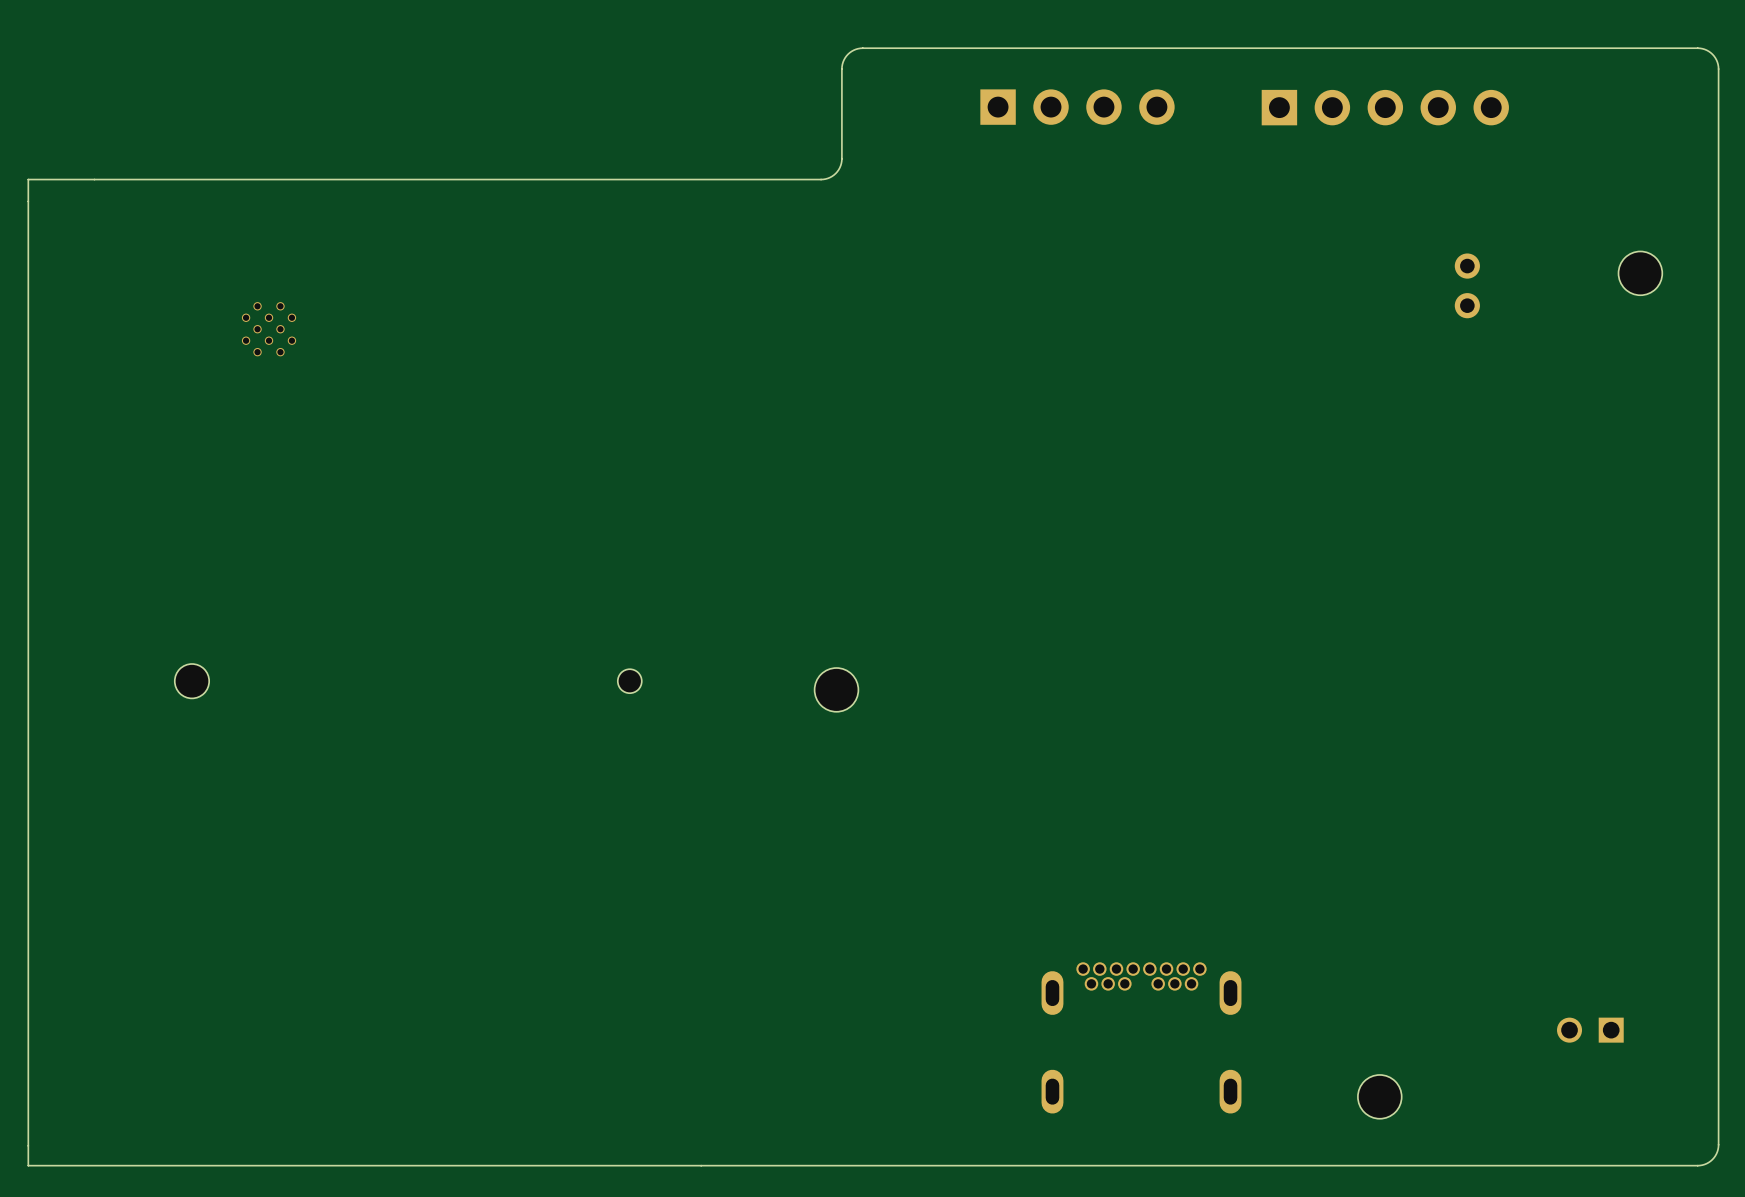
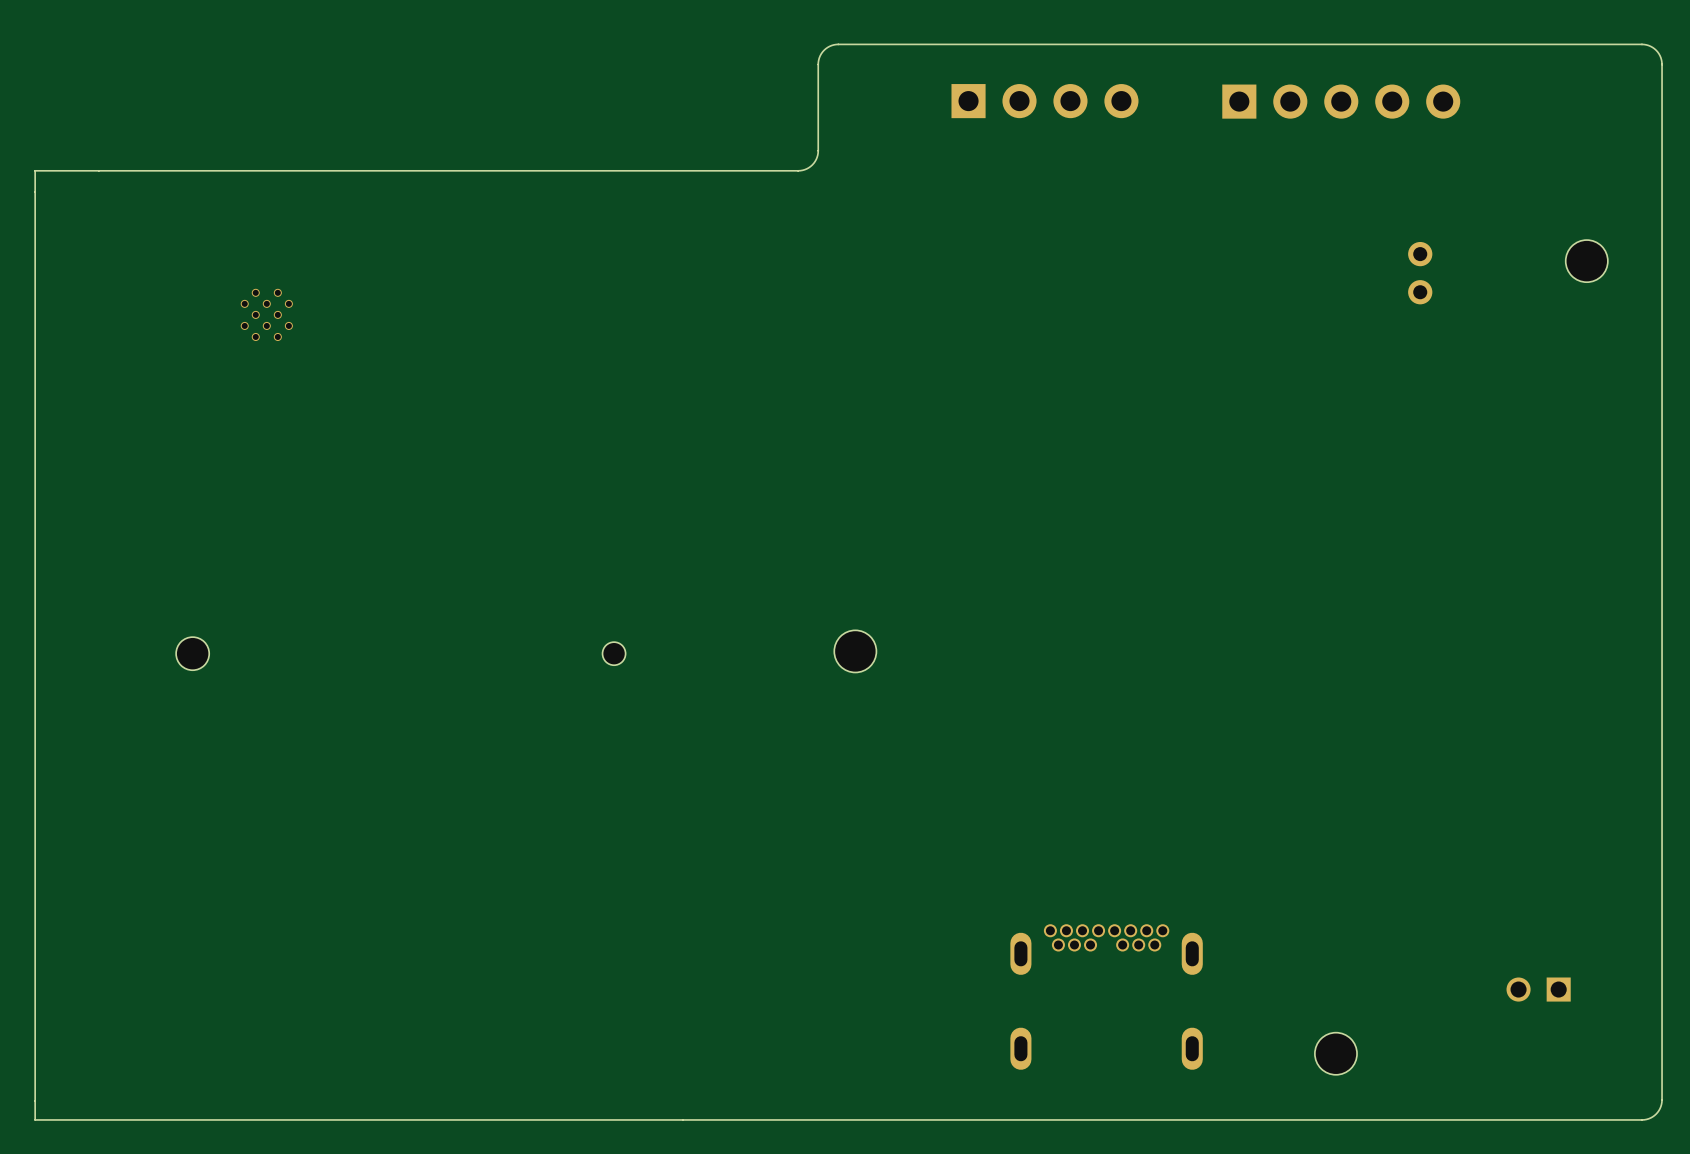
part position: (836, 689) -> (855, 651)

